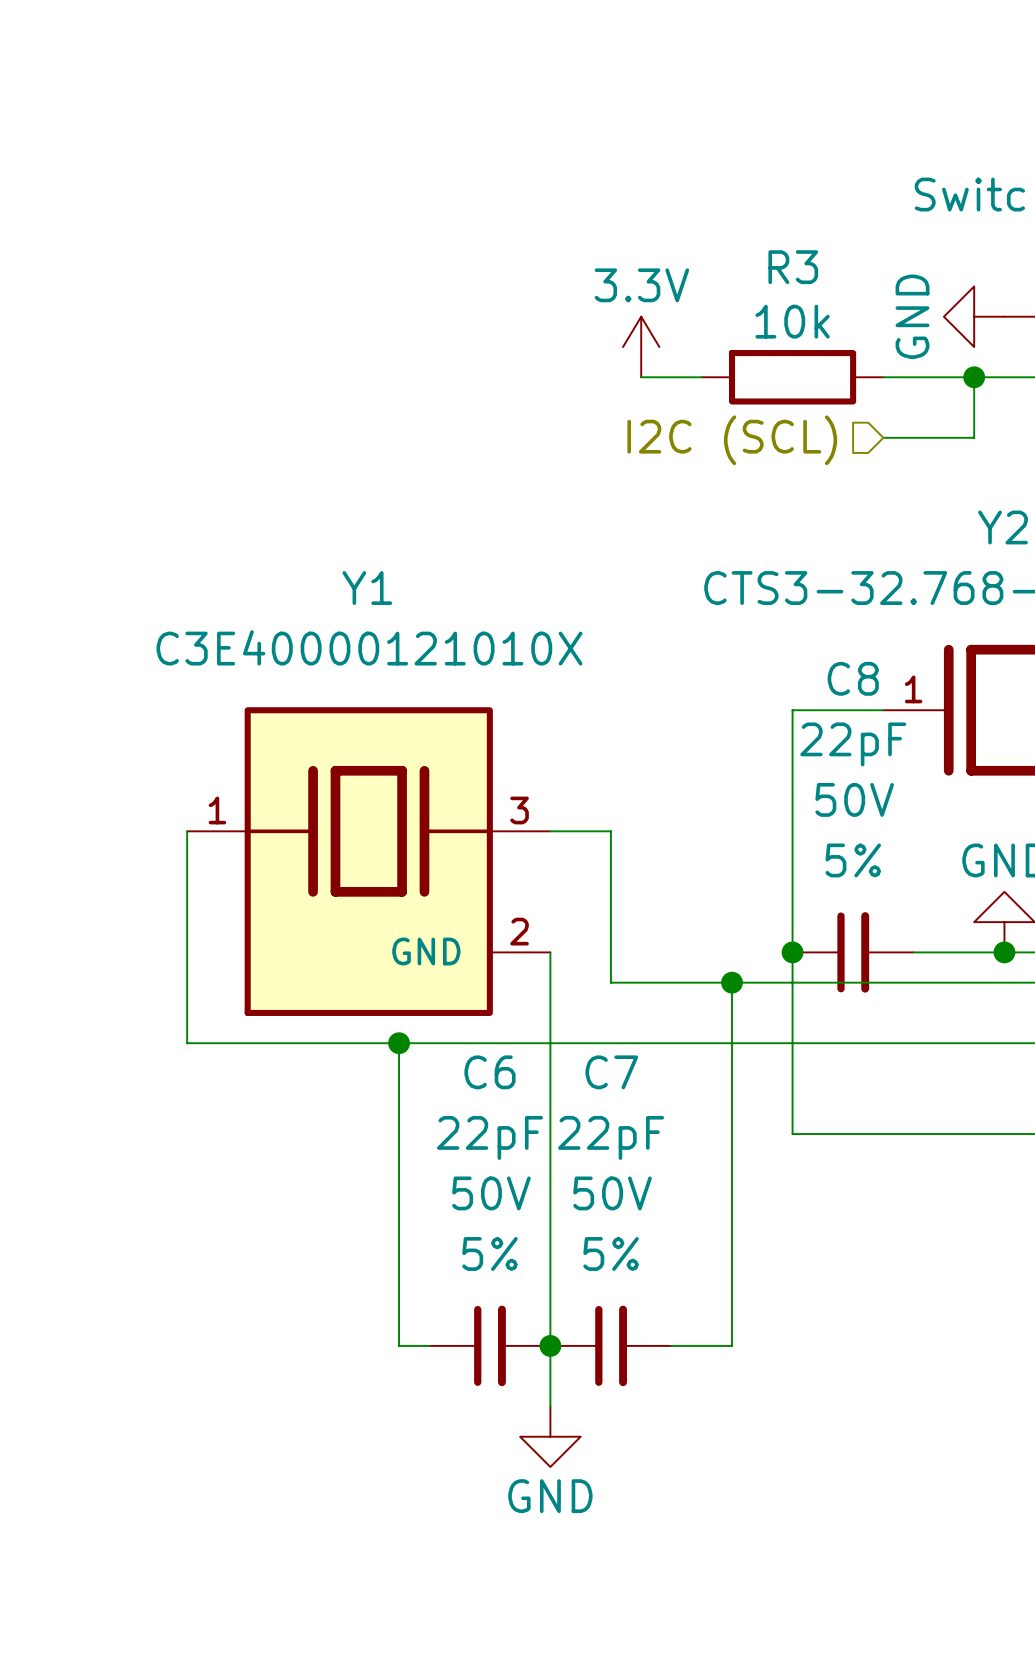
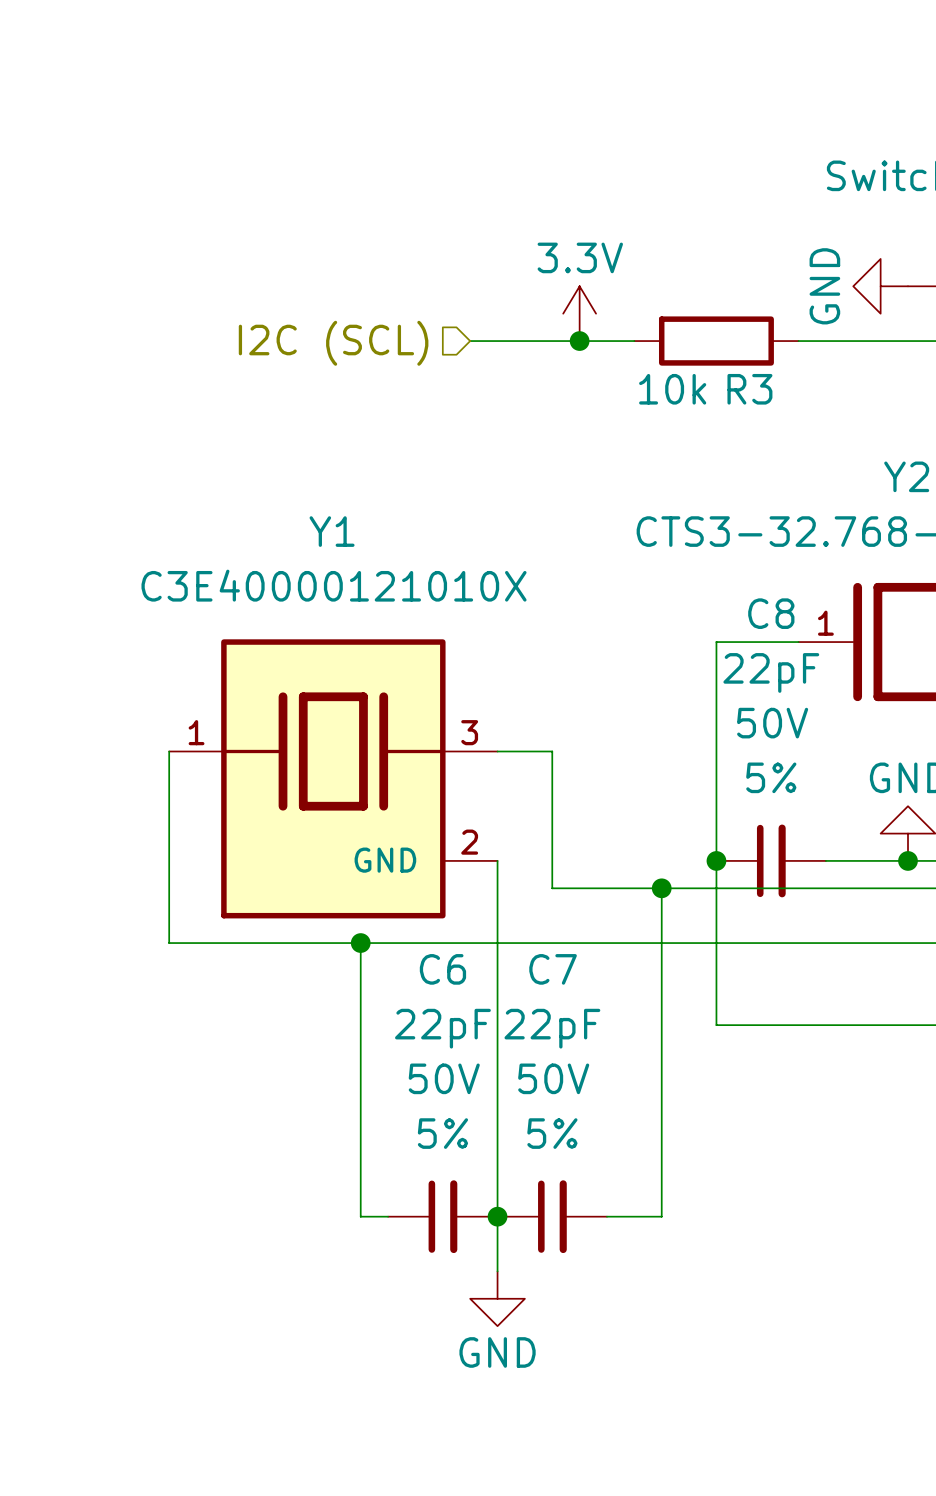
R3 name position: R3 (793, 267) -> R3 (749, 389)
R3 text position: 10k (792, 321) -> 10k (672, 389)
wire: none -> (470, 341) (579, 341)
junction: none -> (579, 341)
wire: (974, 377) (974, 437) (883, 437) -> none
junction: (974, 377) -> none
hierarchical label position: I2C (SCL) (732, 440) -> I2C (SCL) (333, 343)

